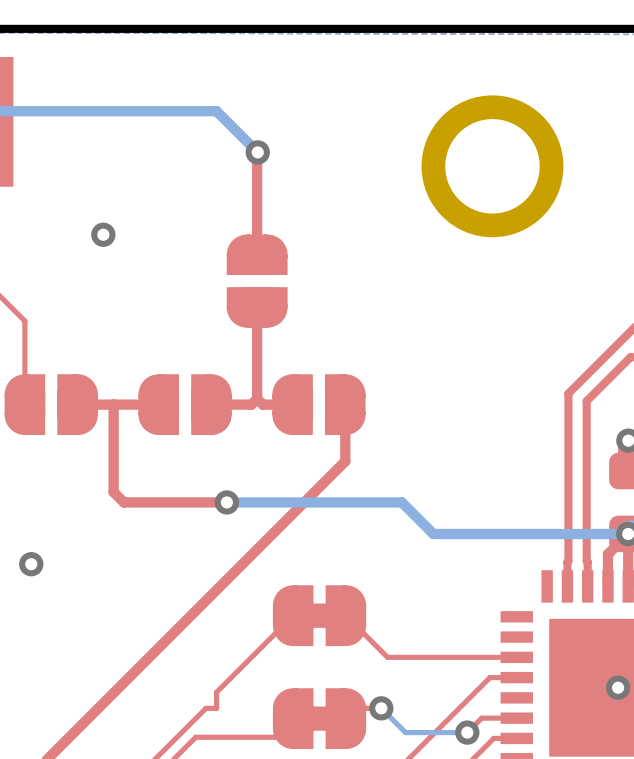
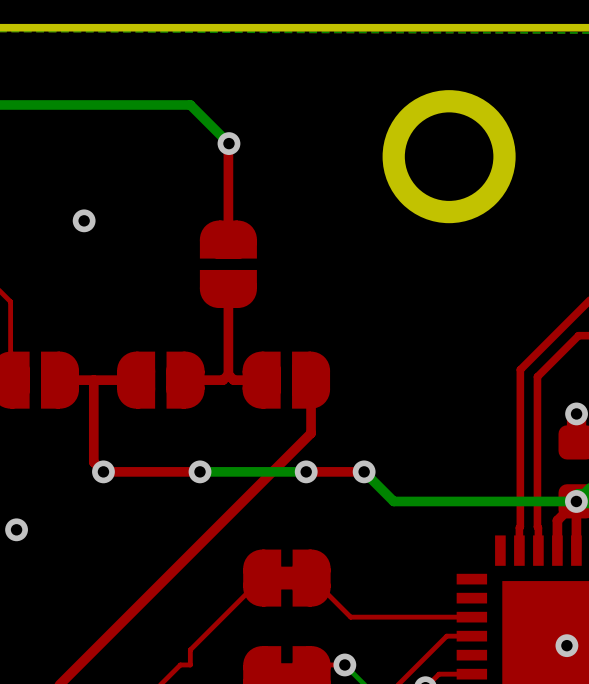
via: none -> (103, 471)
via: none -> (306, 471)
top track: none -> (364, 471) (306, 471)
bottom track: (401, 502) (340, 502) -> none
via: none -> (364, 471)

